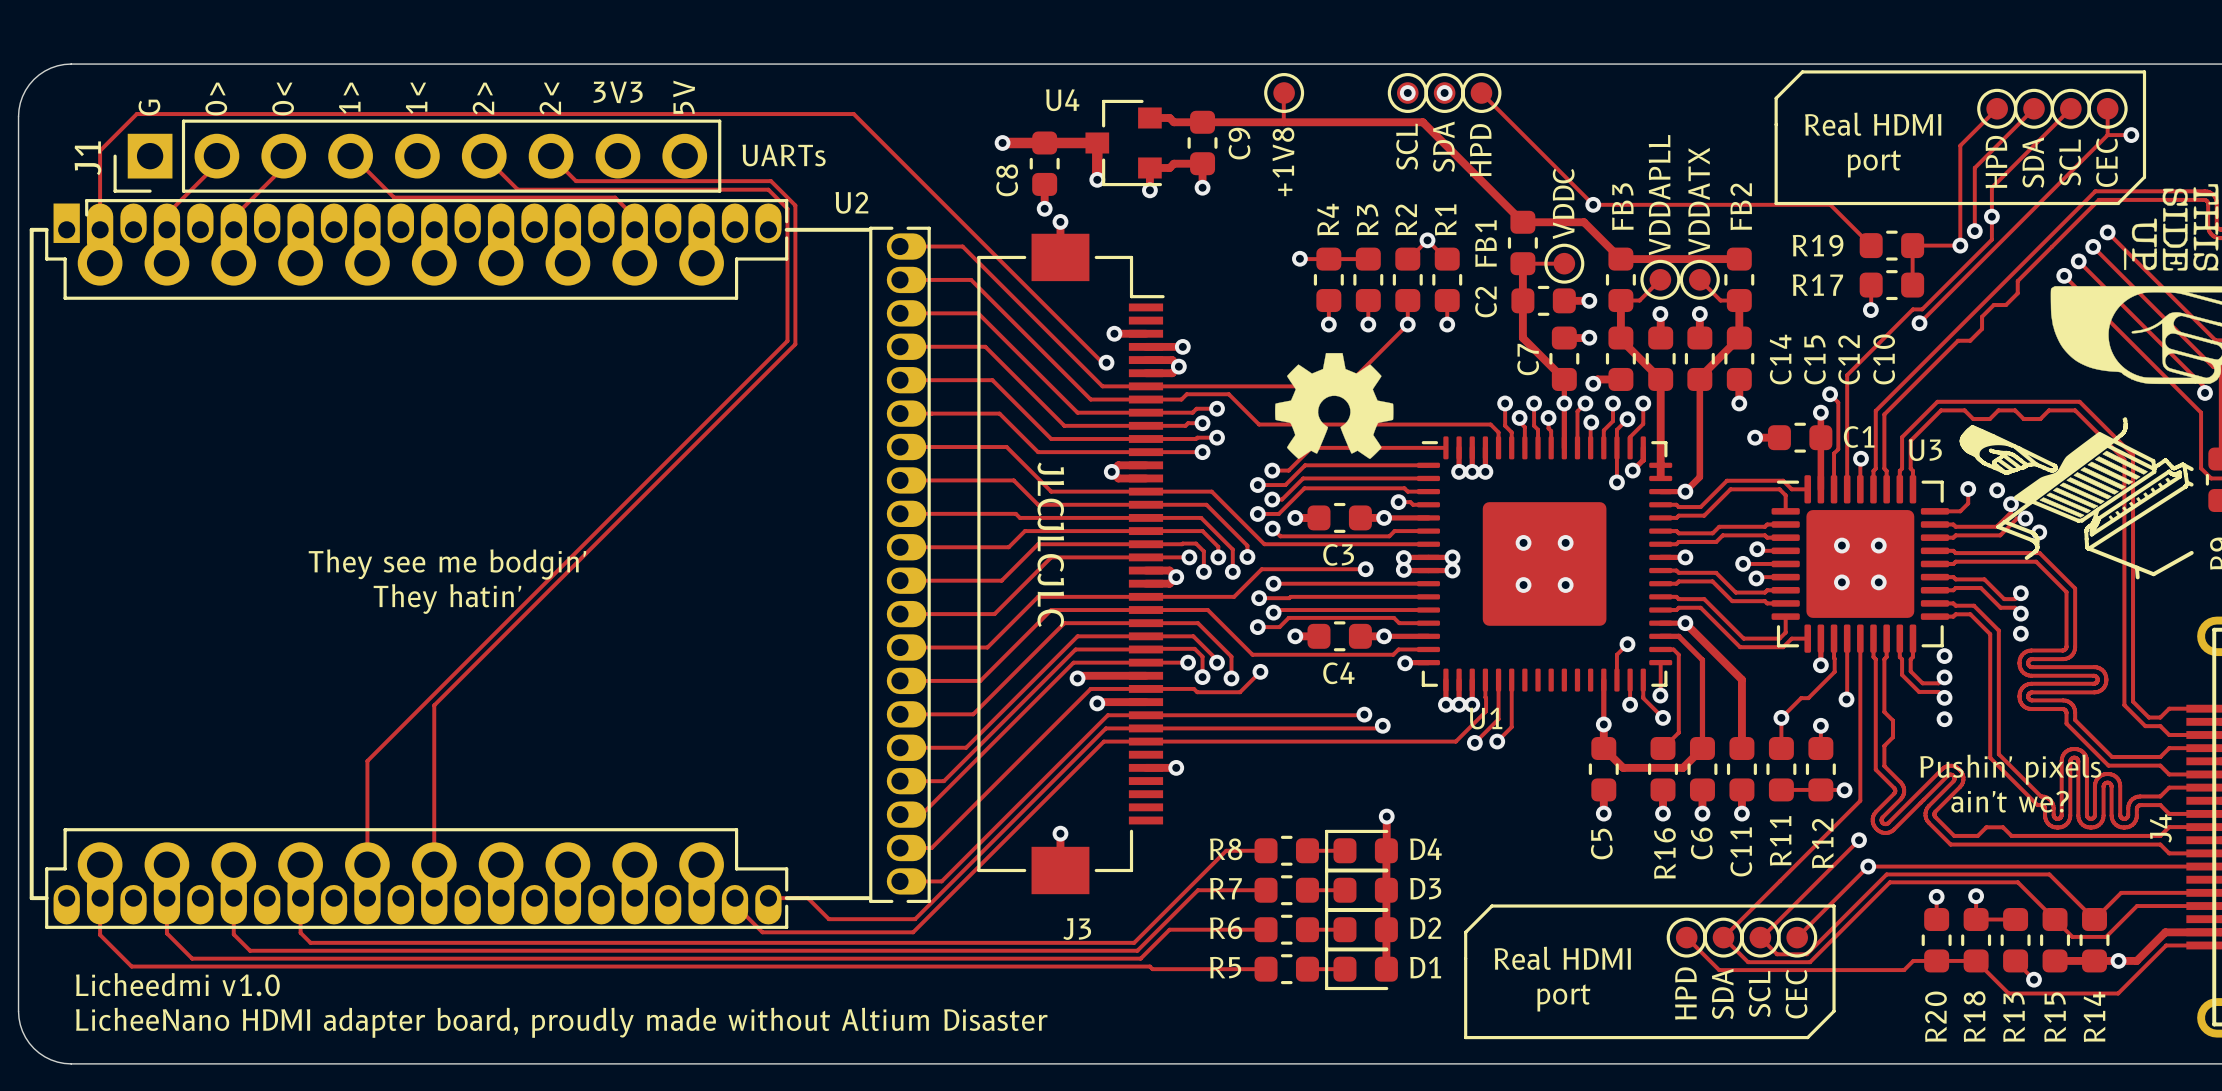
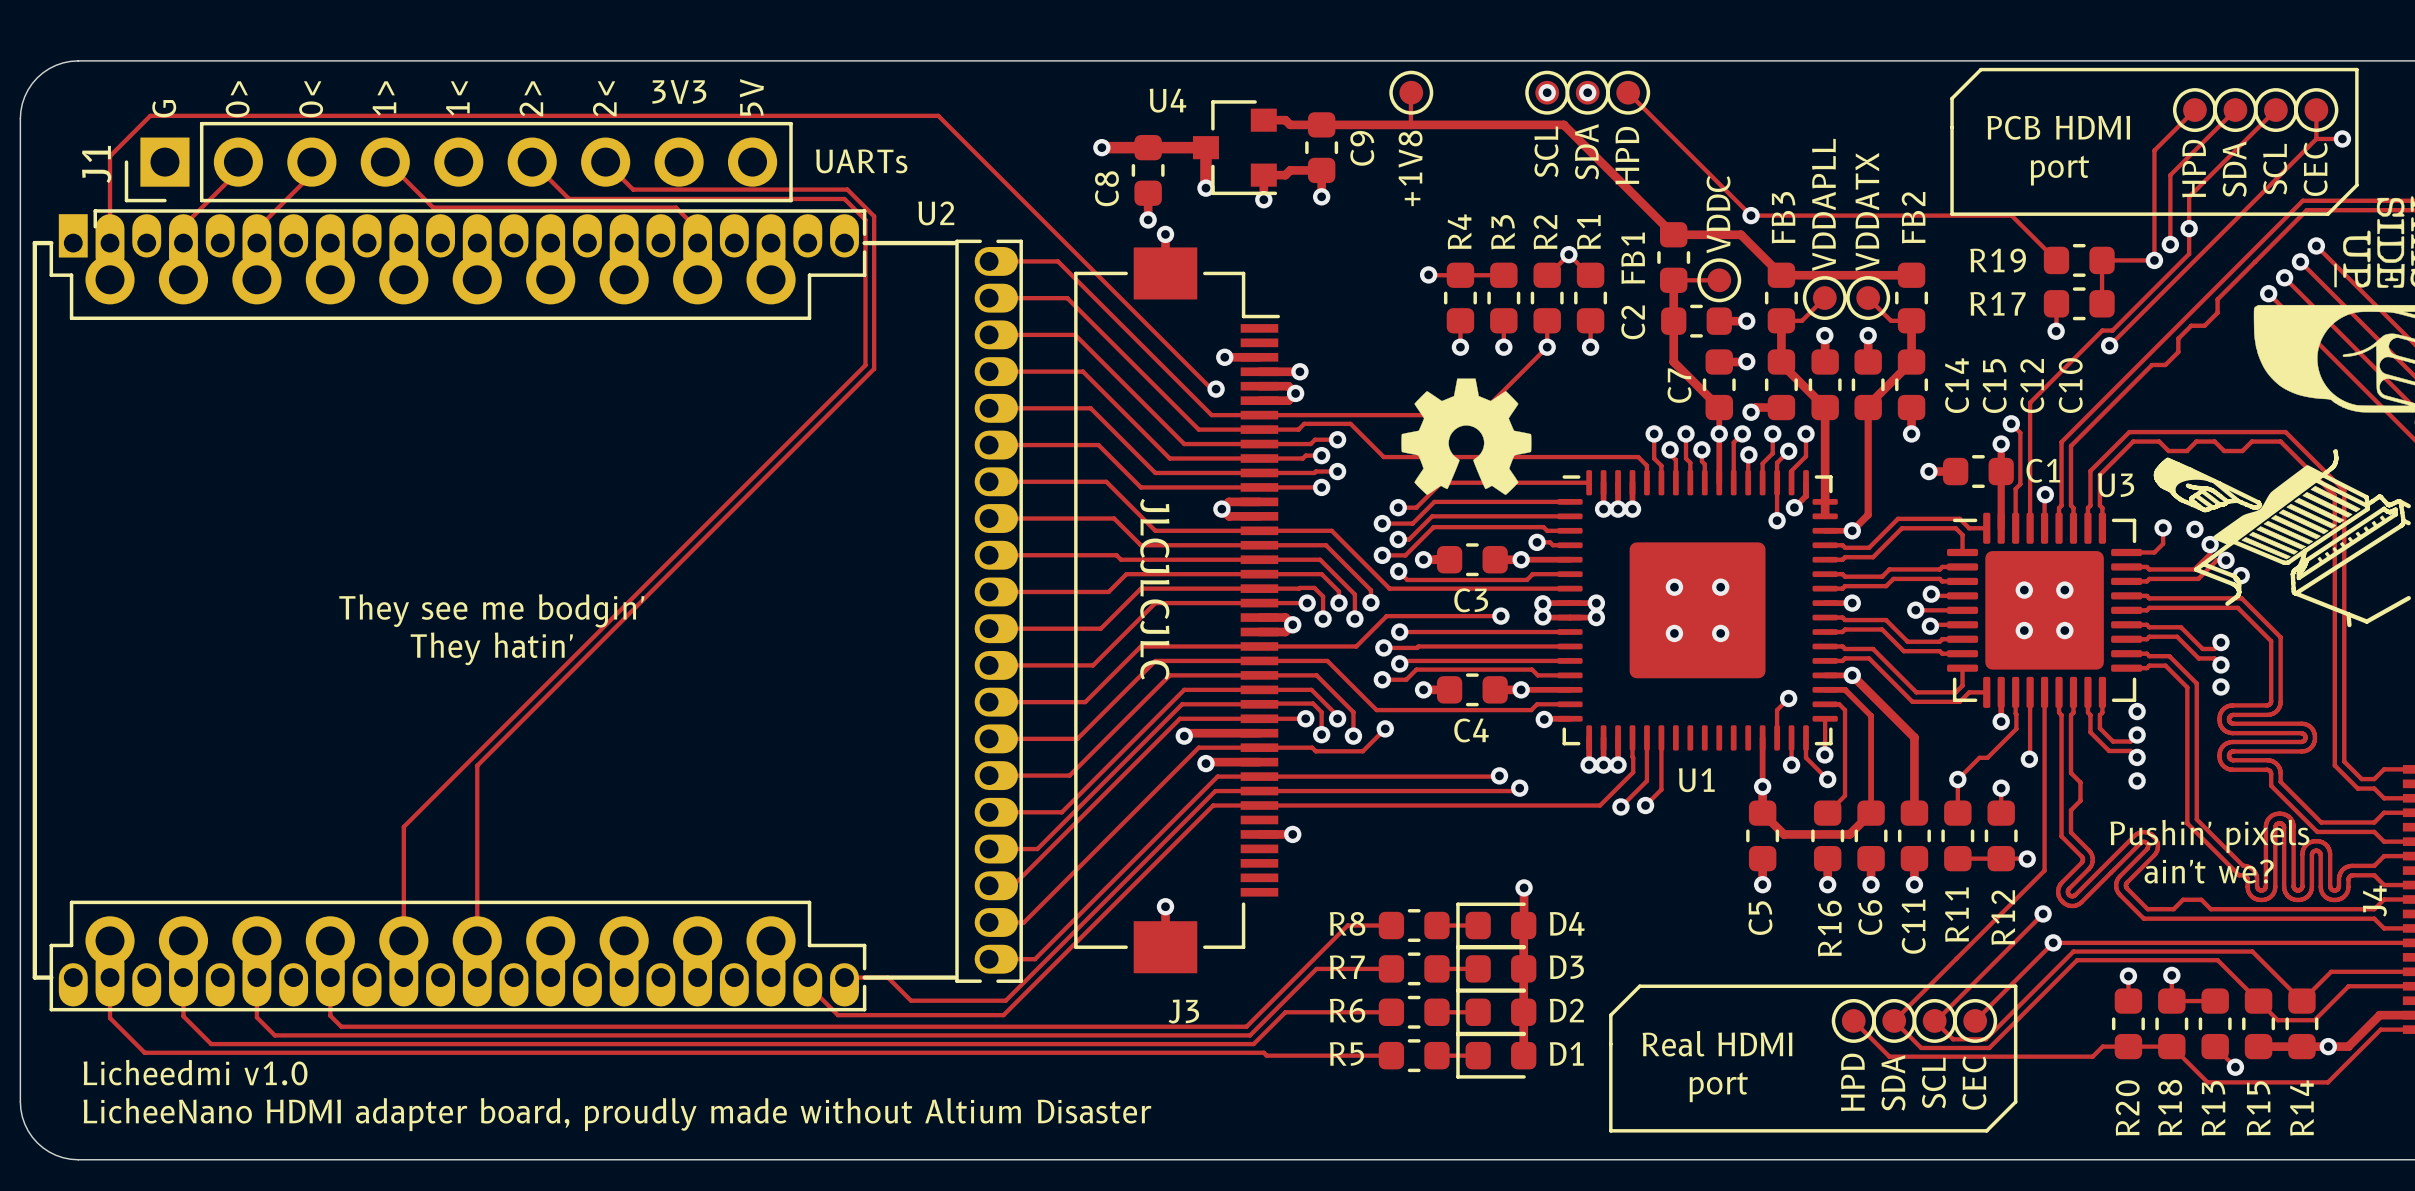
text: Real HDMI (1873, 124) -> PCB HDMI (2058, 127)
U1 name position: U1 (1486, 718) -> U1 (1696, 780)

